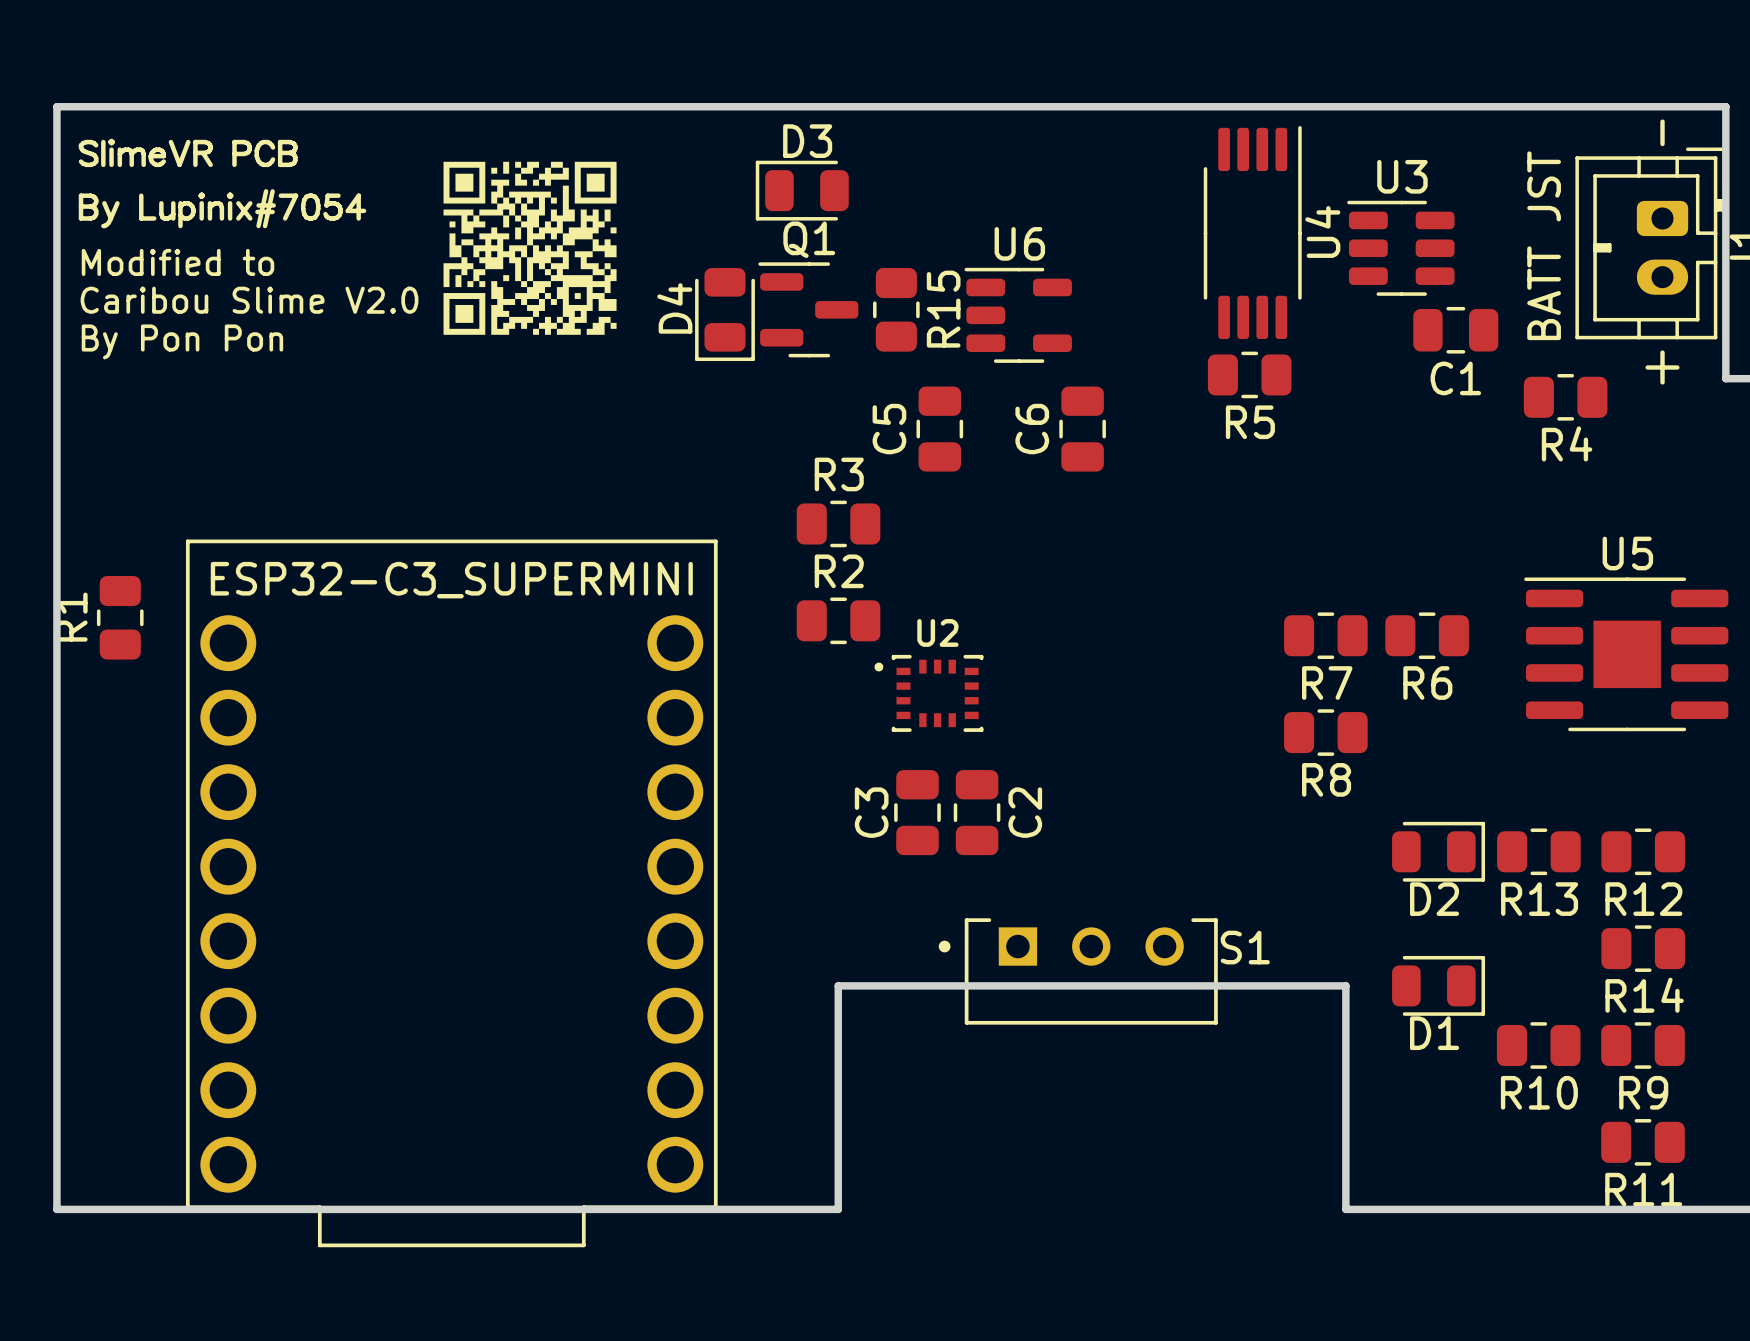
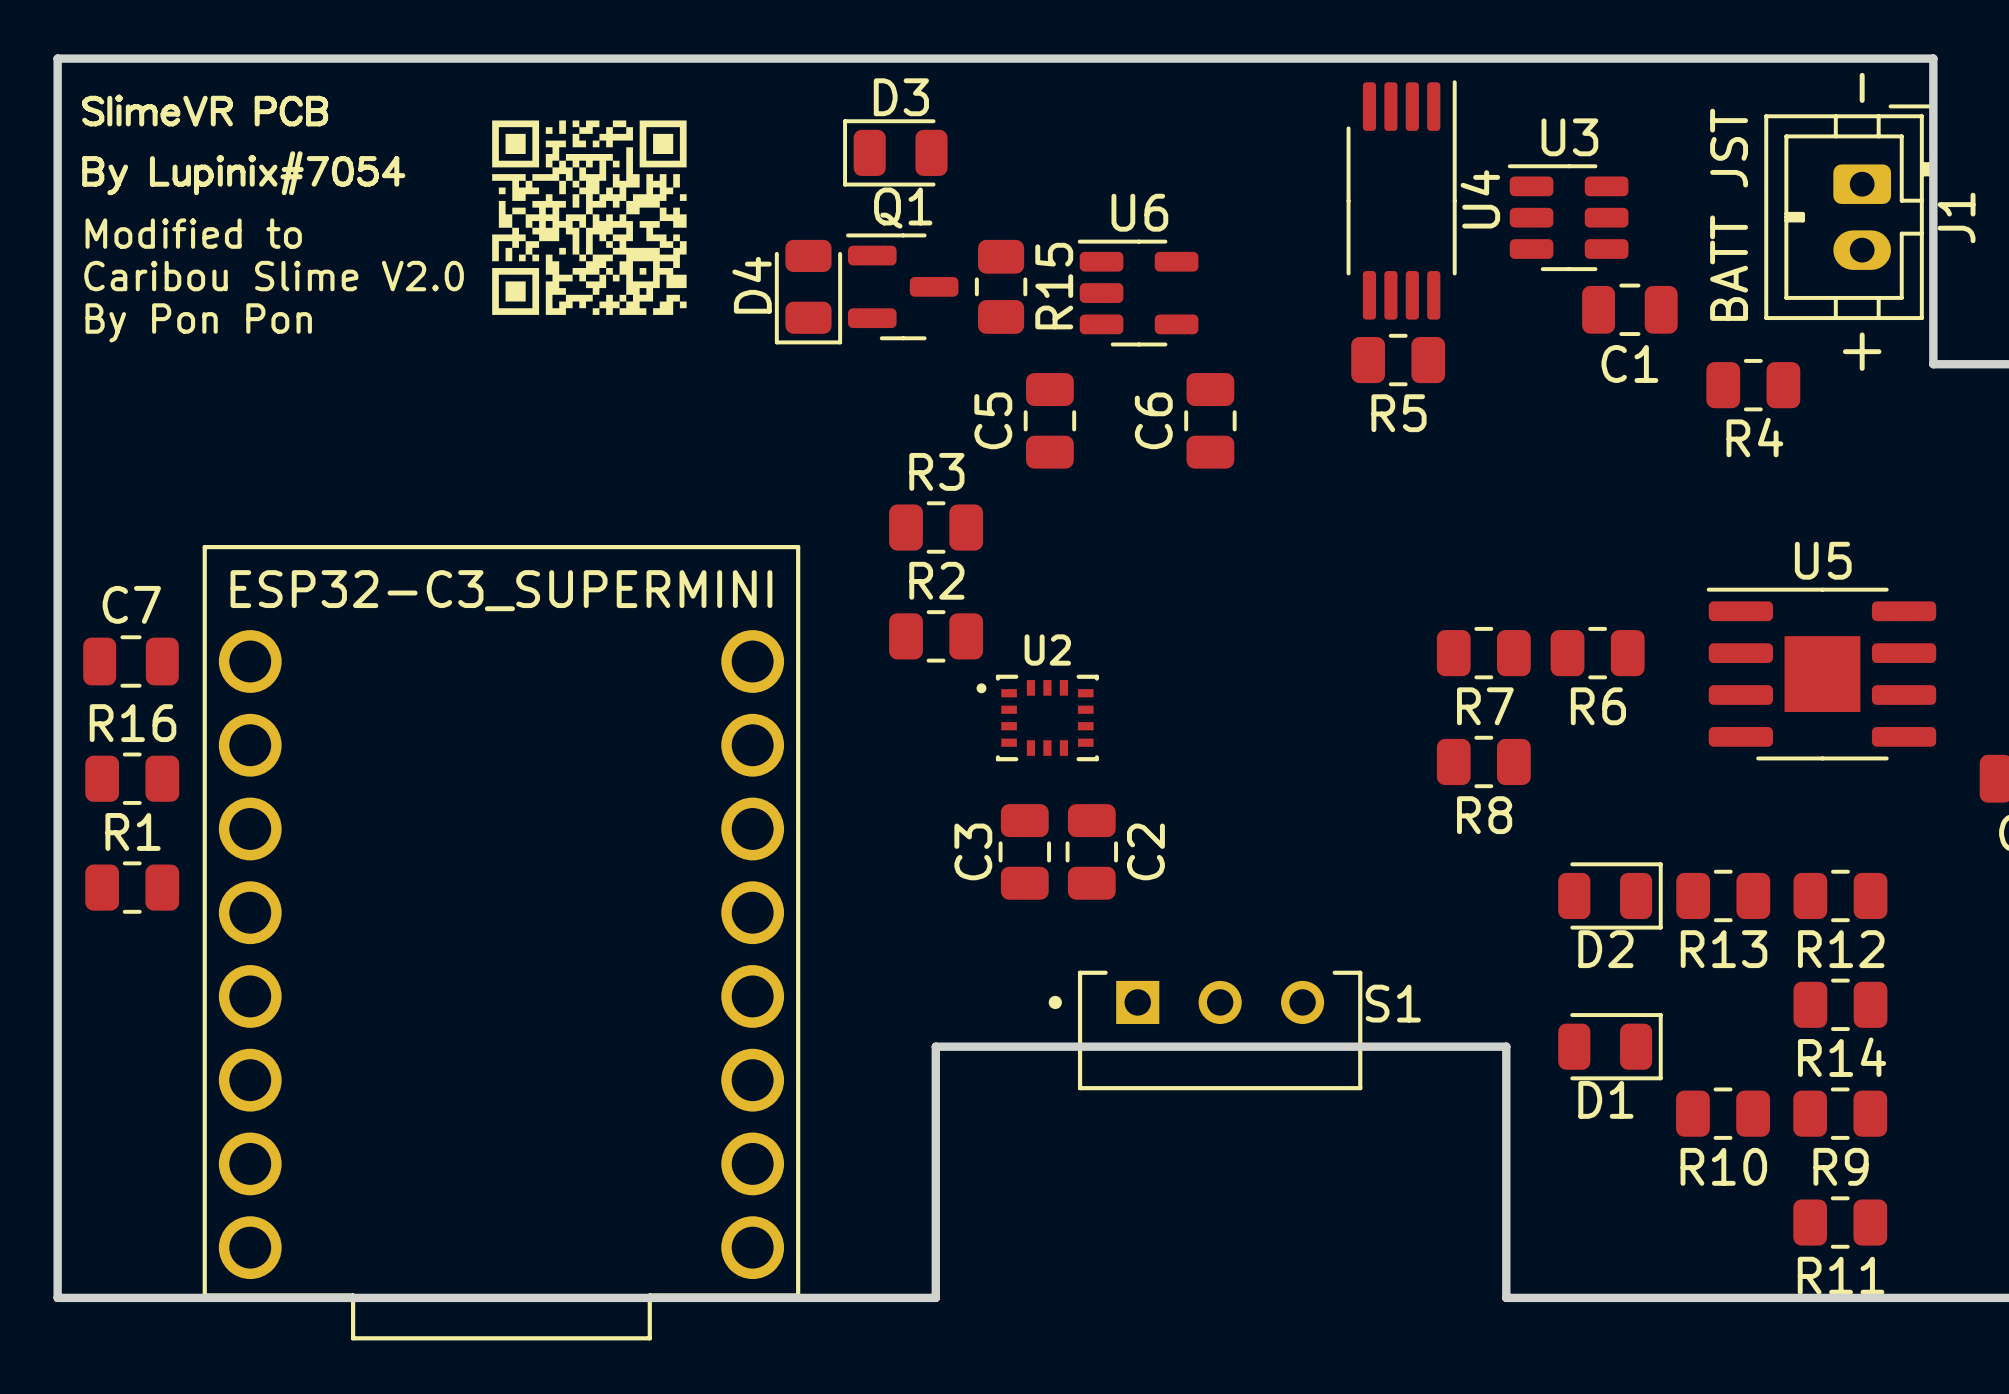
R1 rotation: 0° (120, 617) -> 90° clockwise (132, 887)
R1 position: (120, 617) -> (132, 887)
C7: none -> (131, 661)
R16: none -> (132, 778)

